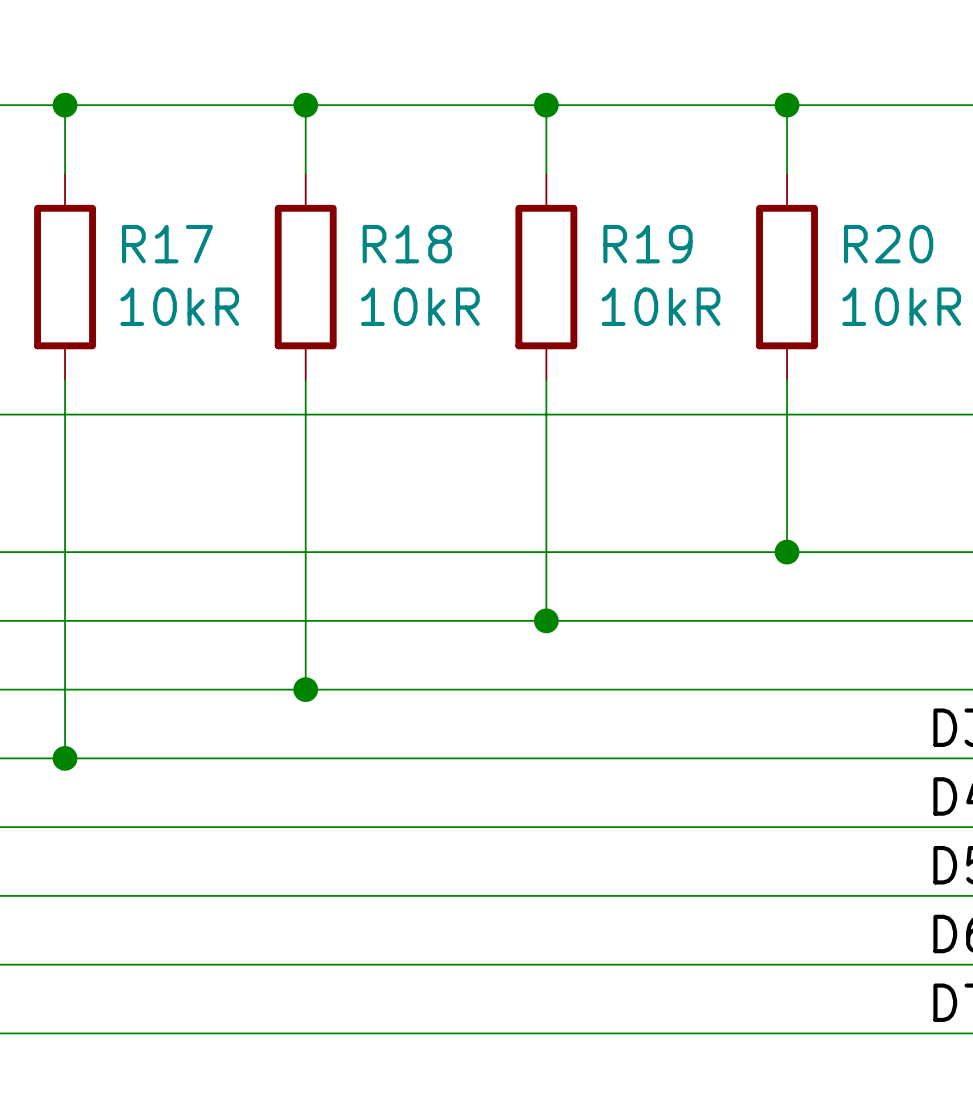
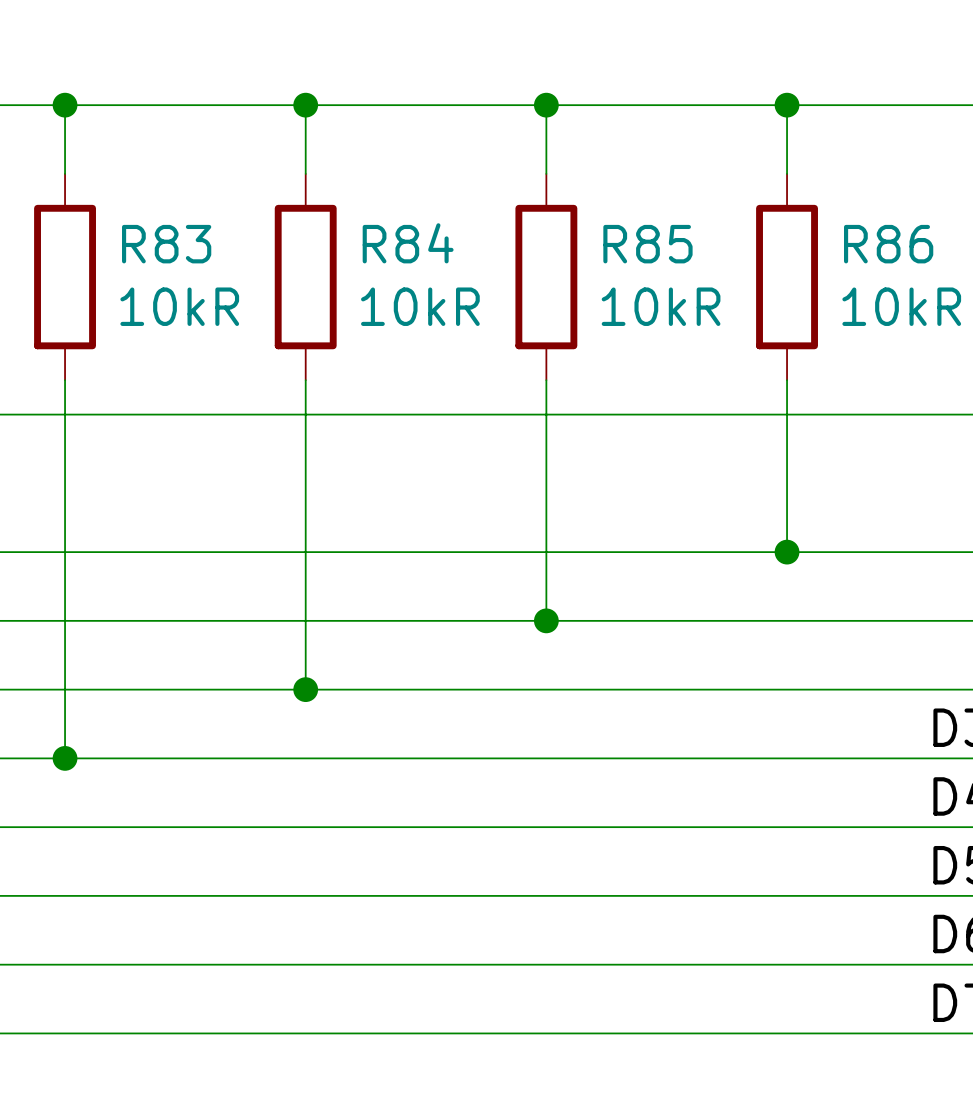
R17 name: R17 (167, 244) -> R83 (166, 244)
R18 name: R18 (407, 244) -> R84 (408, 243)
R19 name: R19 (647, 244) -> R85 (647, 244)
R20 name: R20 (888, 244) -> R86 (888, 244)

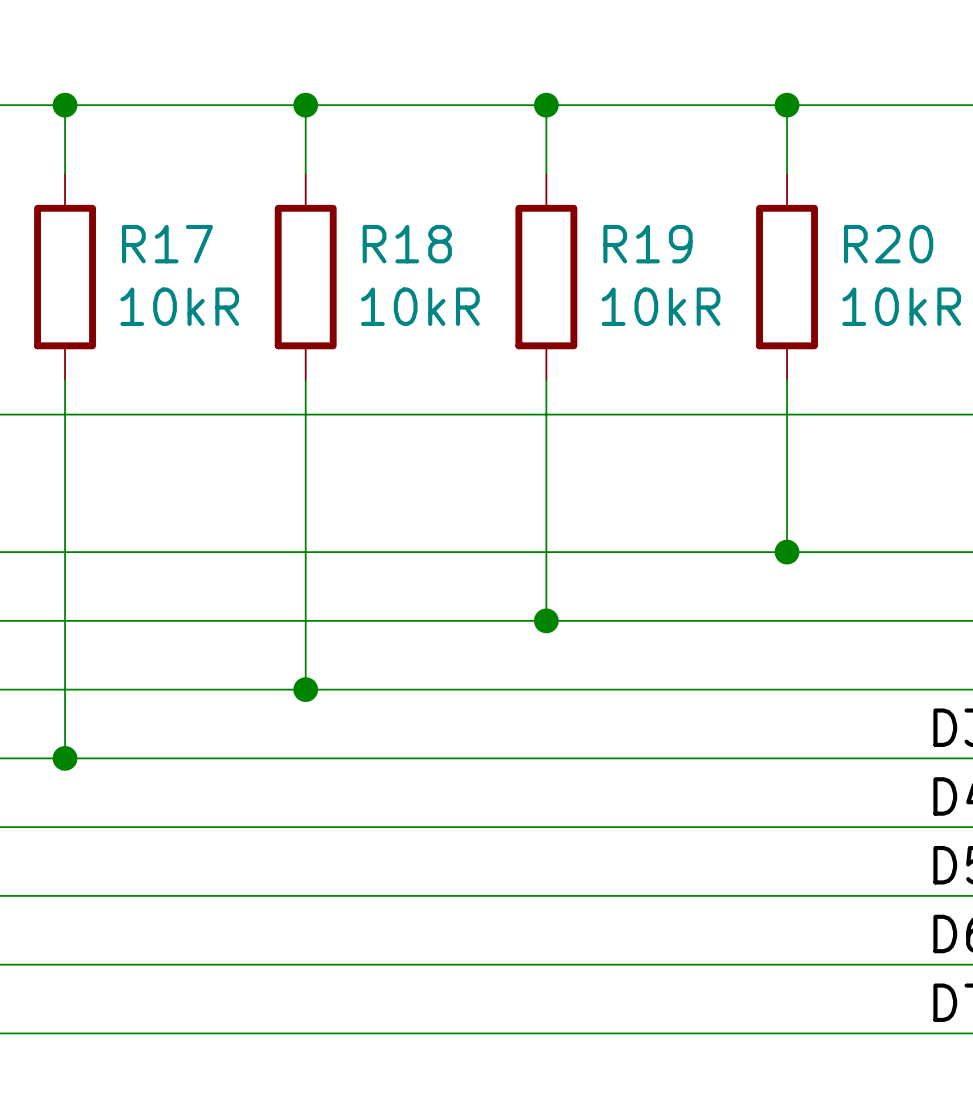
R84 name: R84 (408, 243) -> R18 (407, 244)
R83 name: R83 (166, 244) -> R17 (167, 244)
R85 name: R85 (647, 244) -> R19 (647, 244)
R86 name: R86 (888, 244) -> R20 (888, 244)

